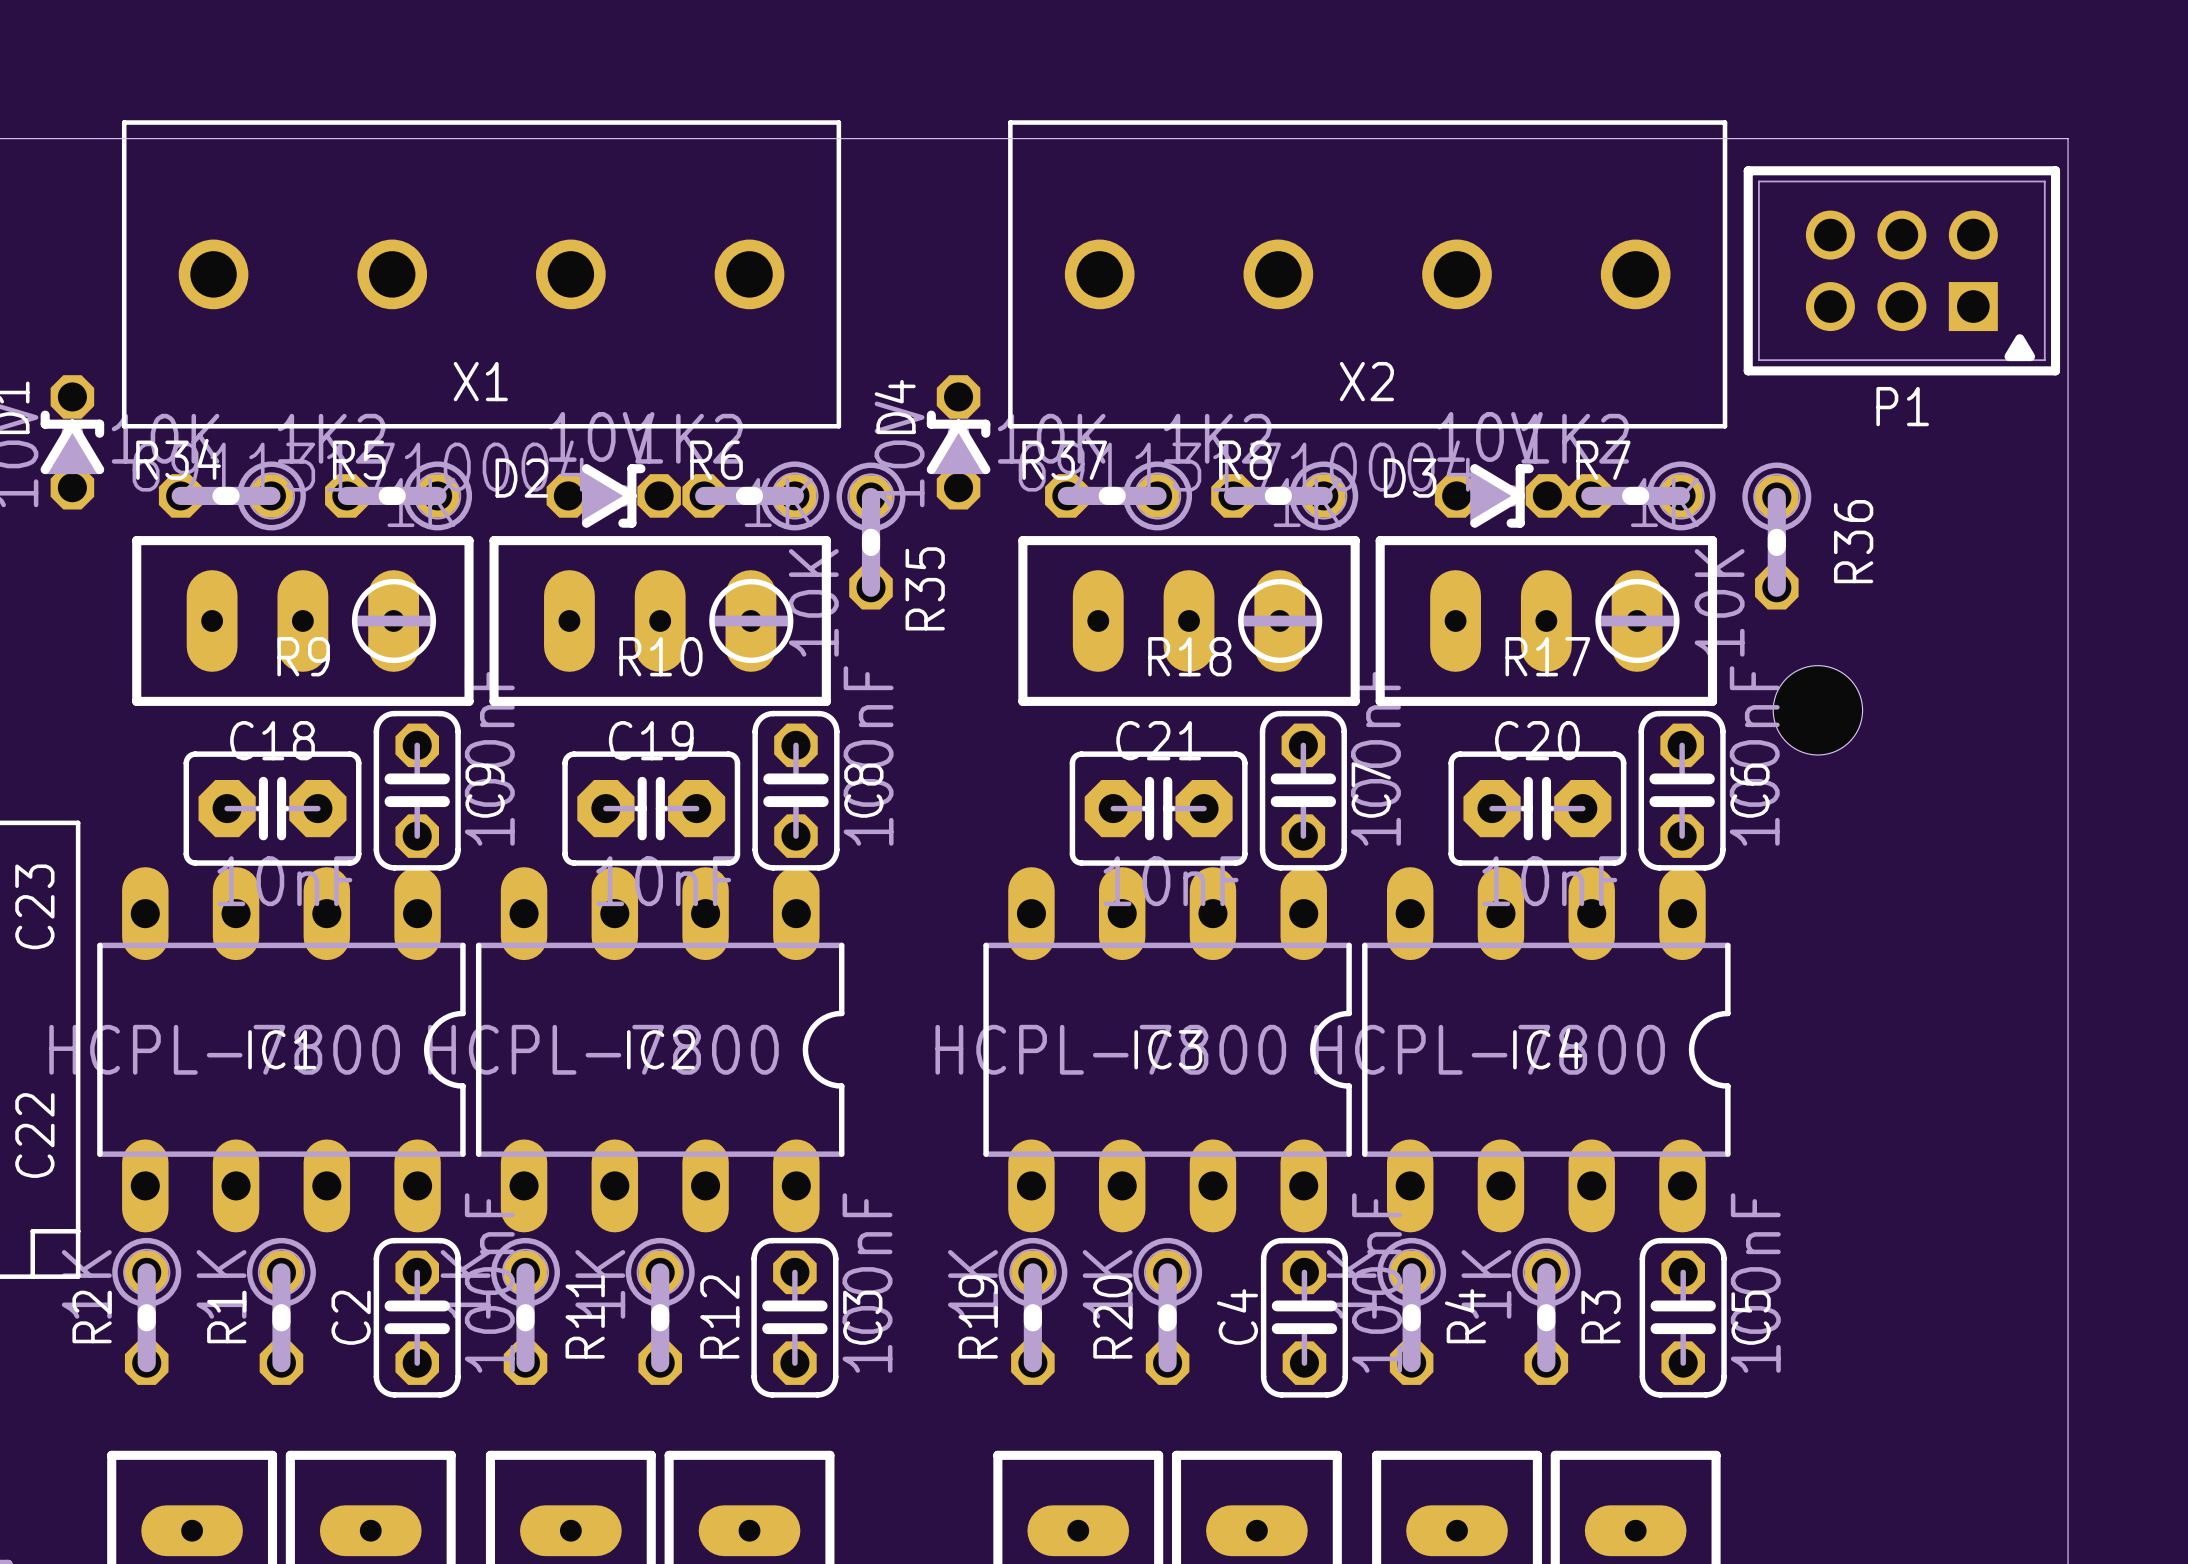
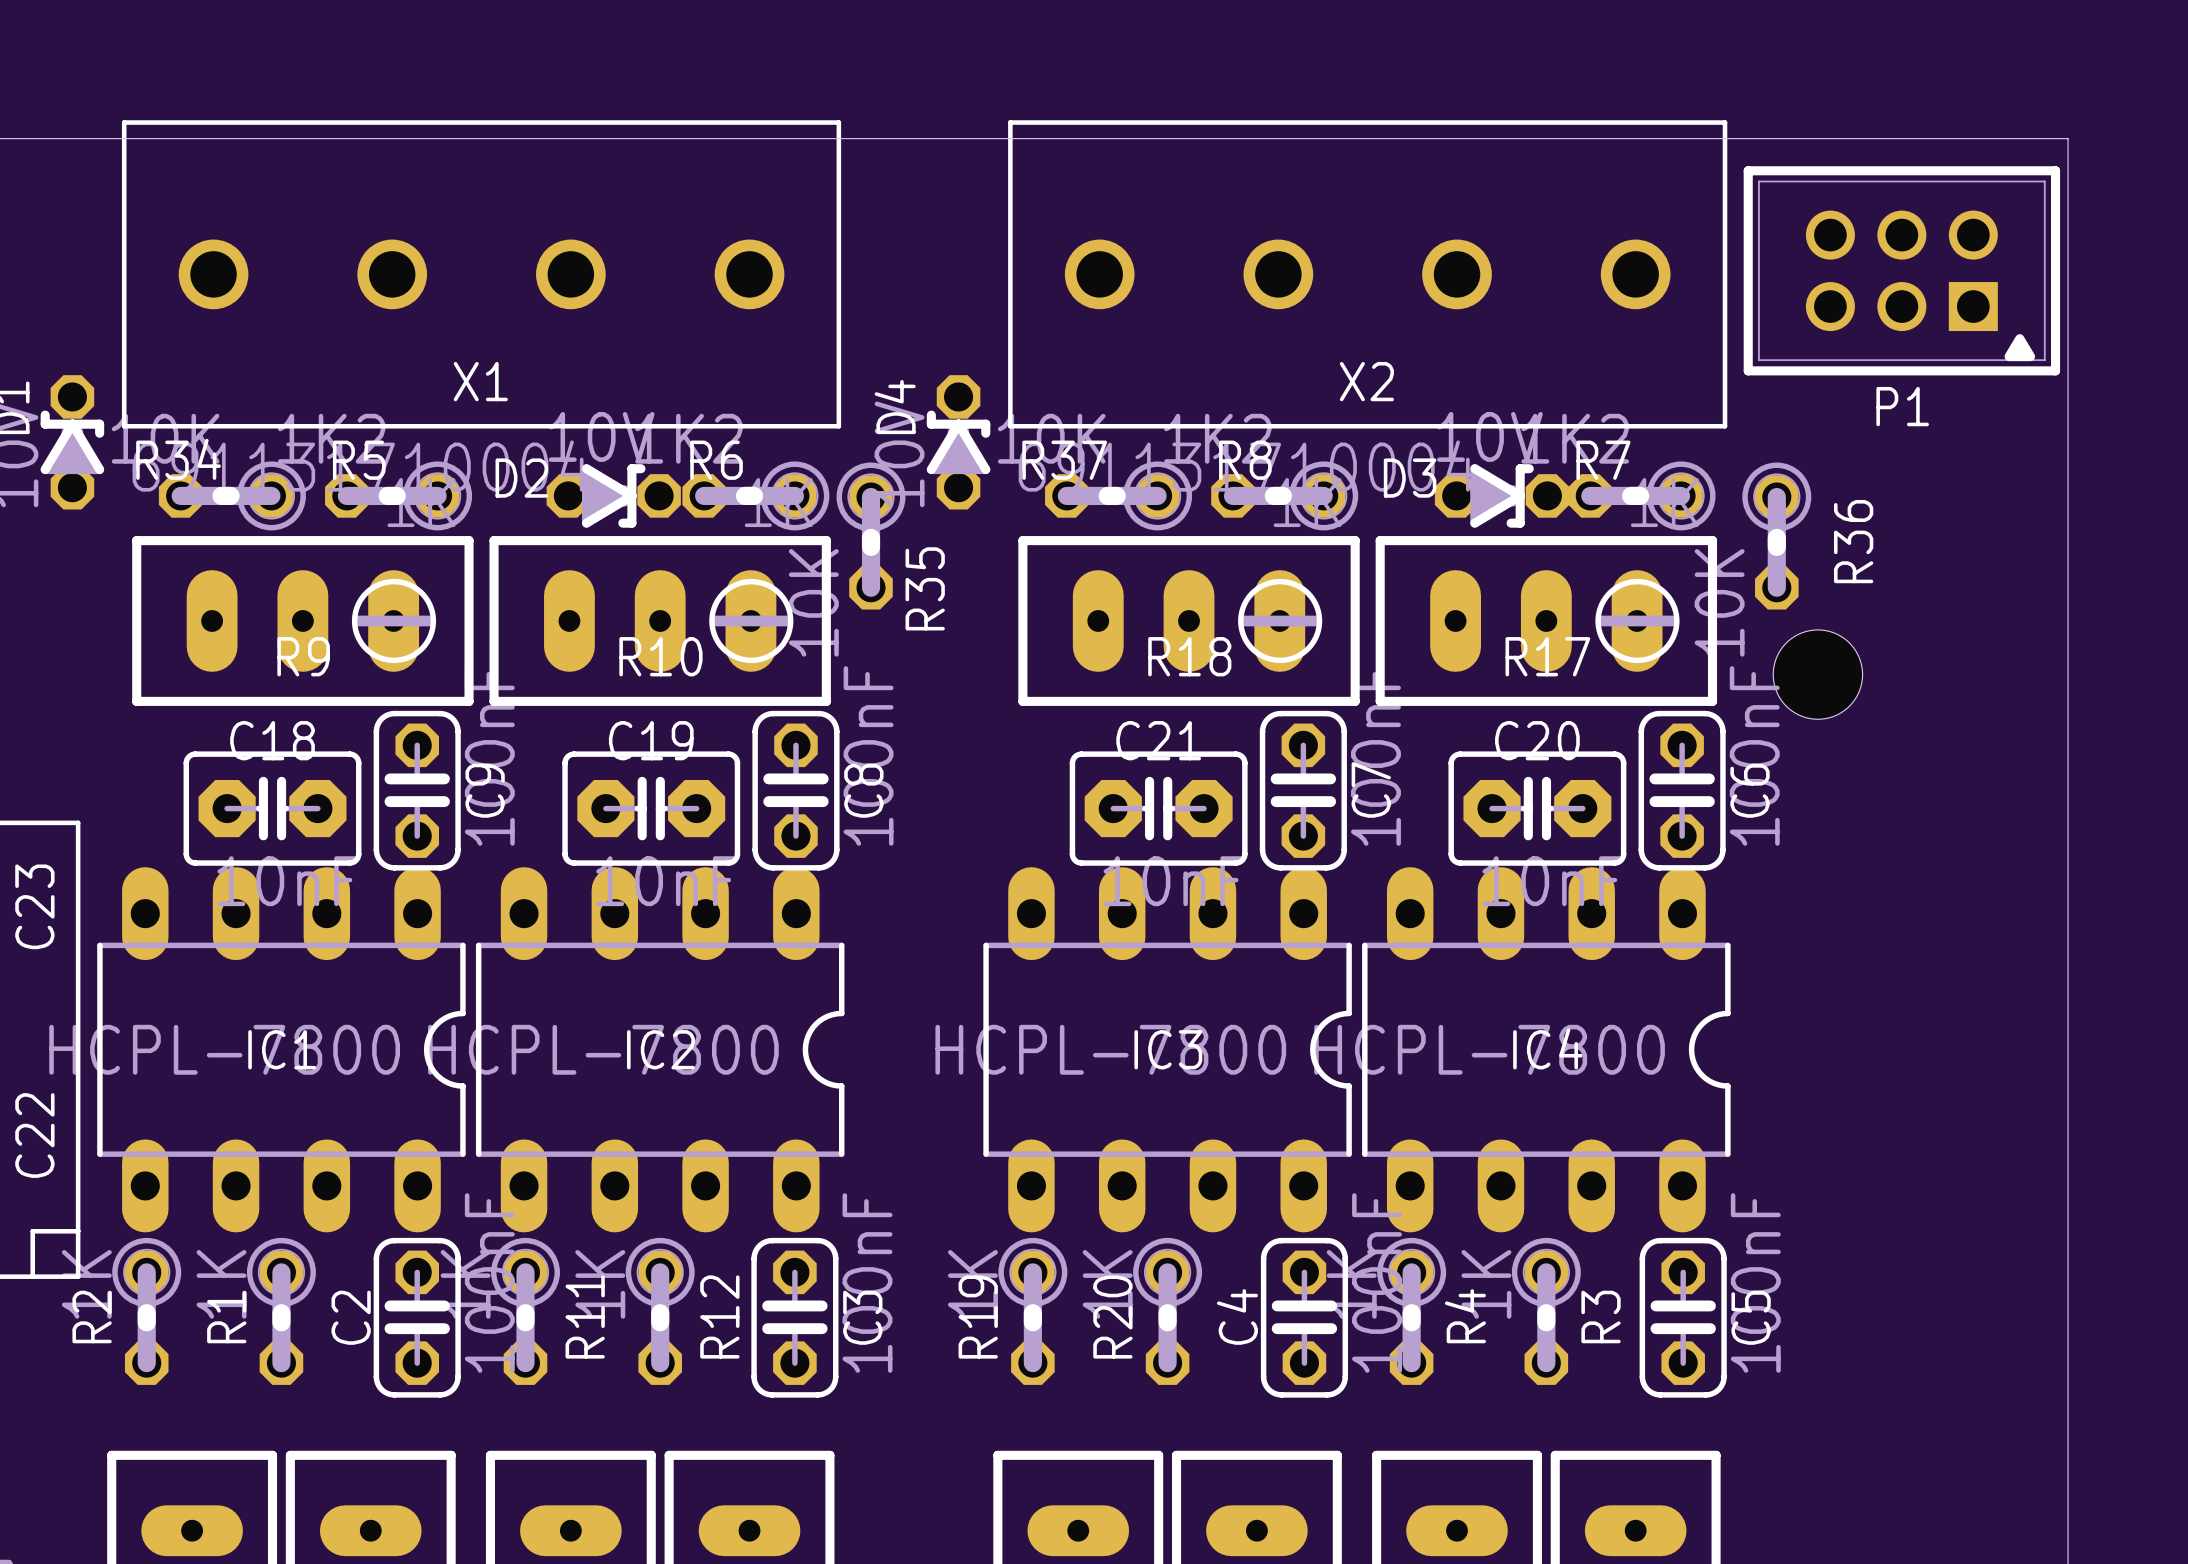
hole position: (1817, 710) -> (1817, 674)

